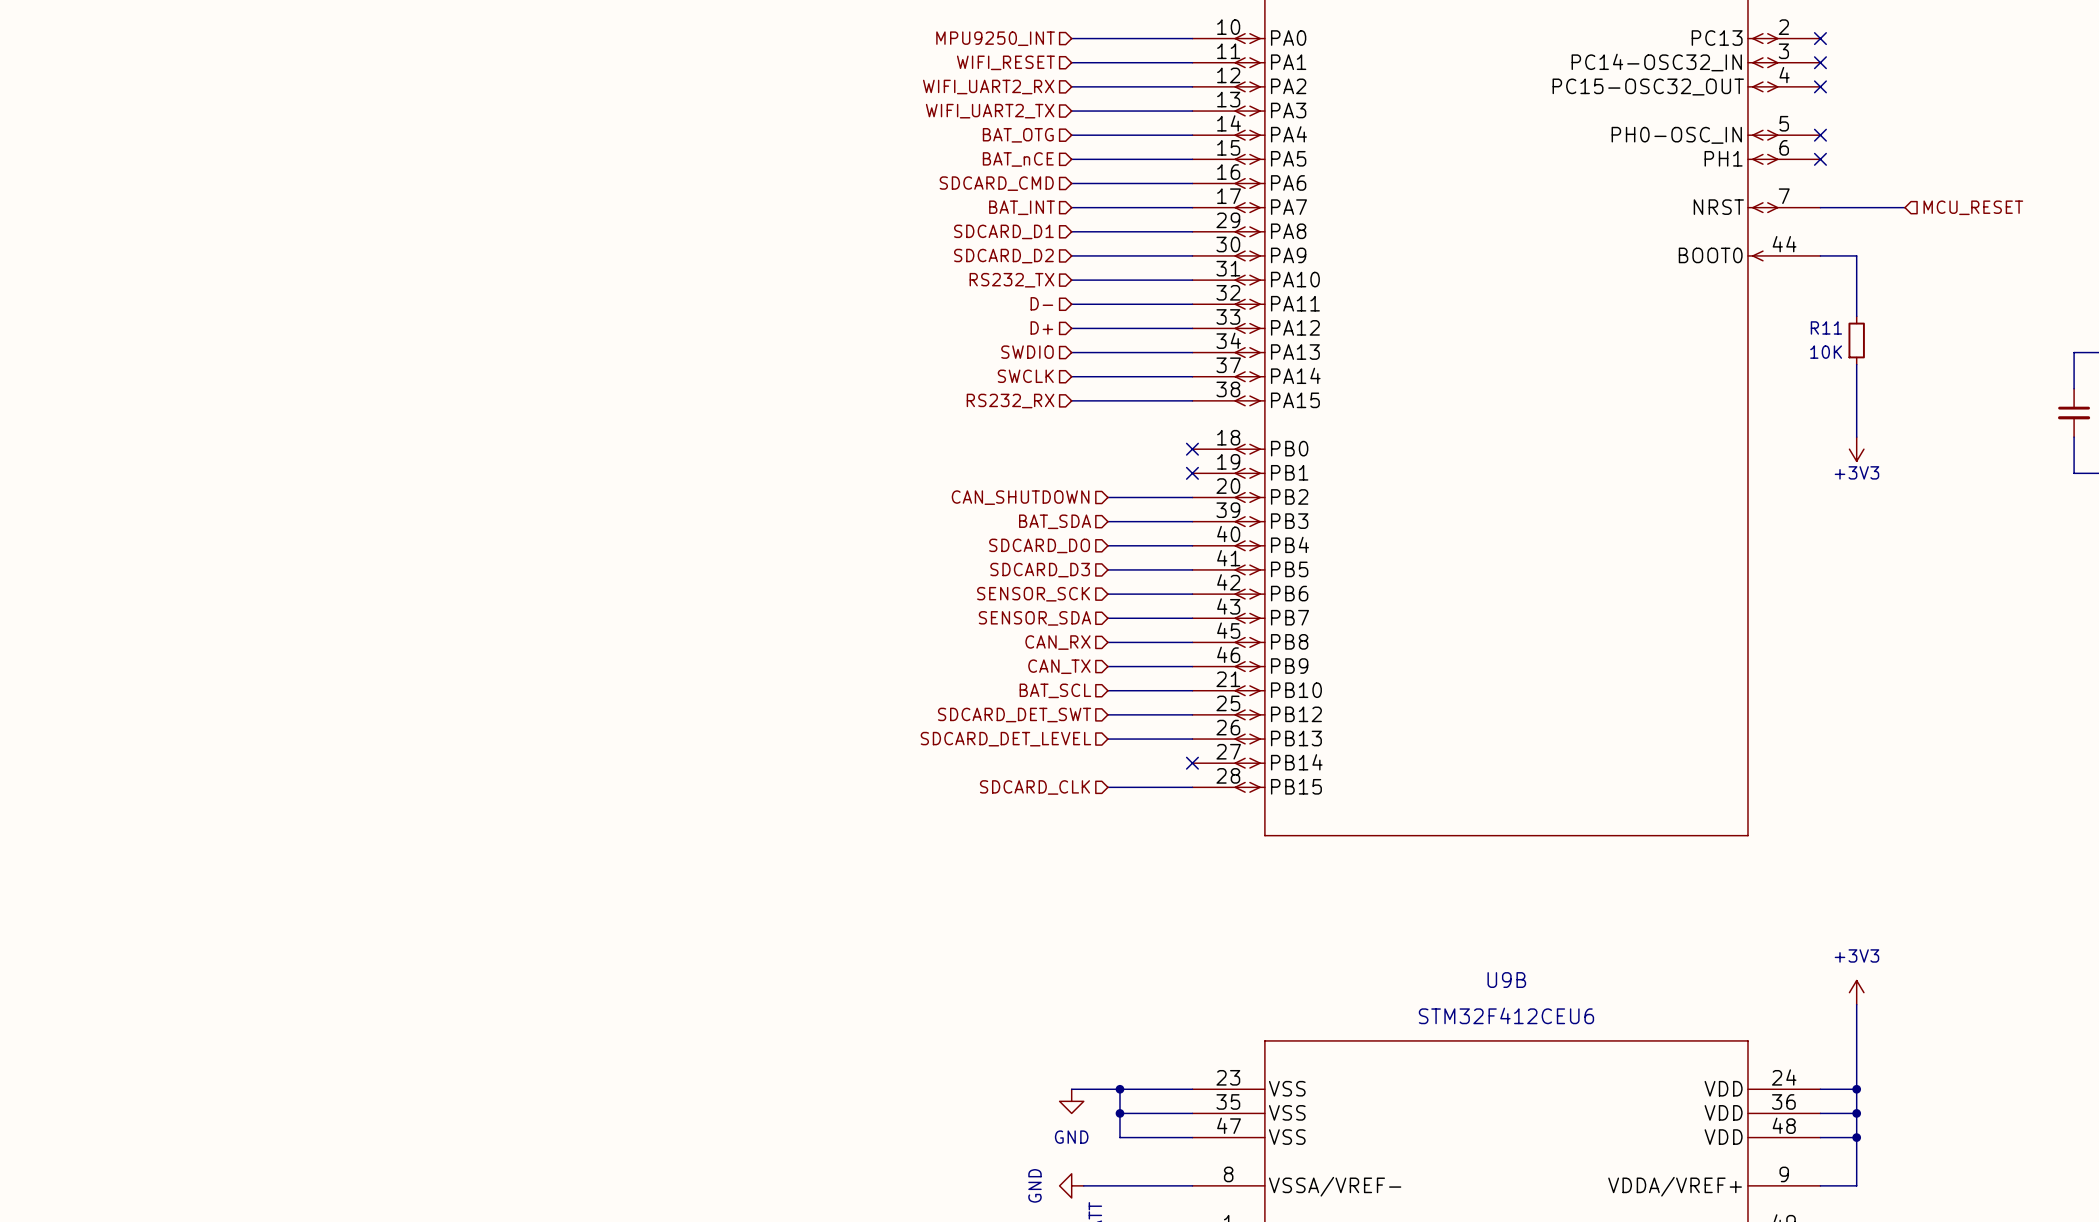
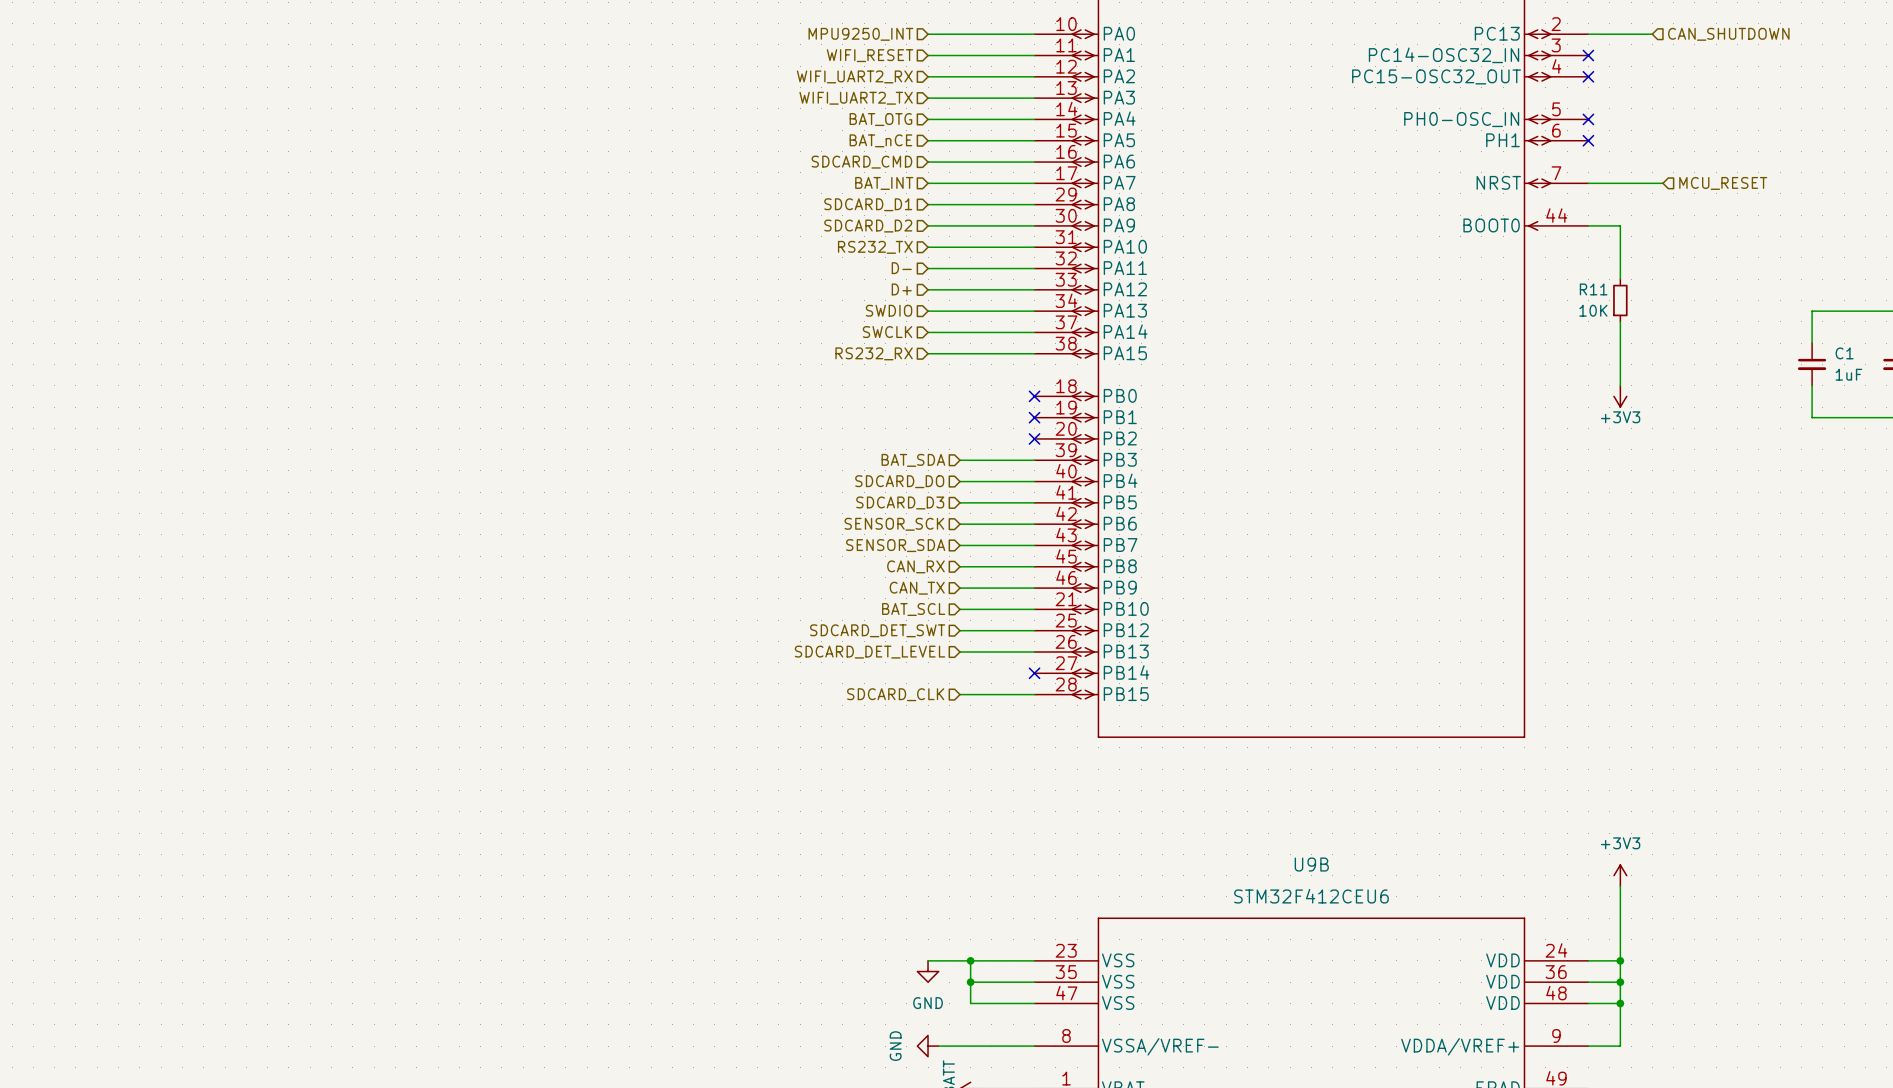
wire: none -> (1588, 34) (1652, 34)
no-connect mark: (1820, 38) -> none
hierarchical label: none -> CAN_SHUTDOWN (1728, 34)
hierarchical label: CAN_SHUTDOWN (1020, 497) -> none
wire: (1107, 497) (1192, 497) -> none
no-connect mark: none -> (1034, 438)

